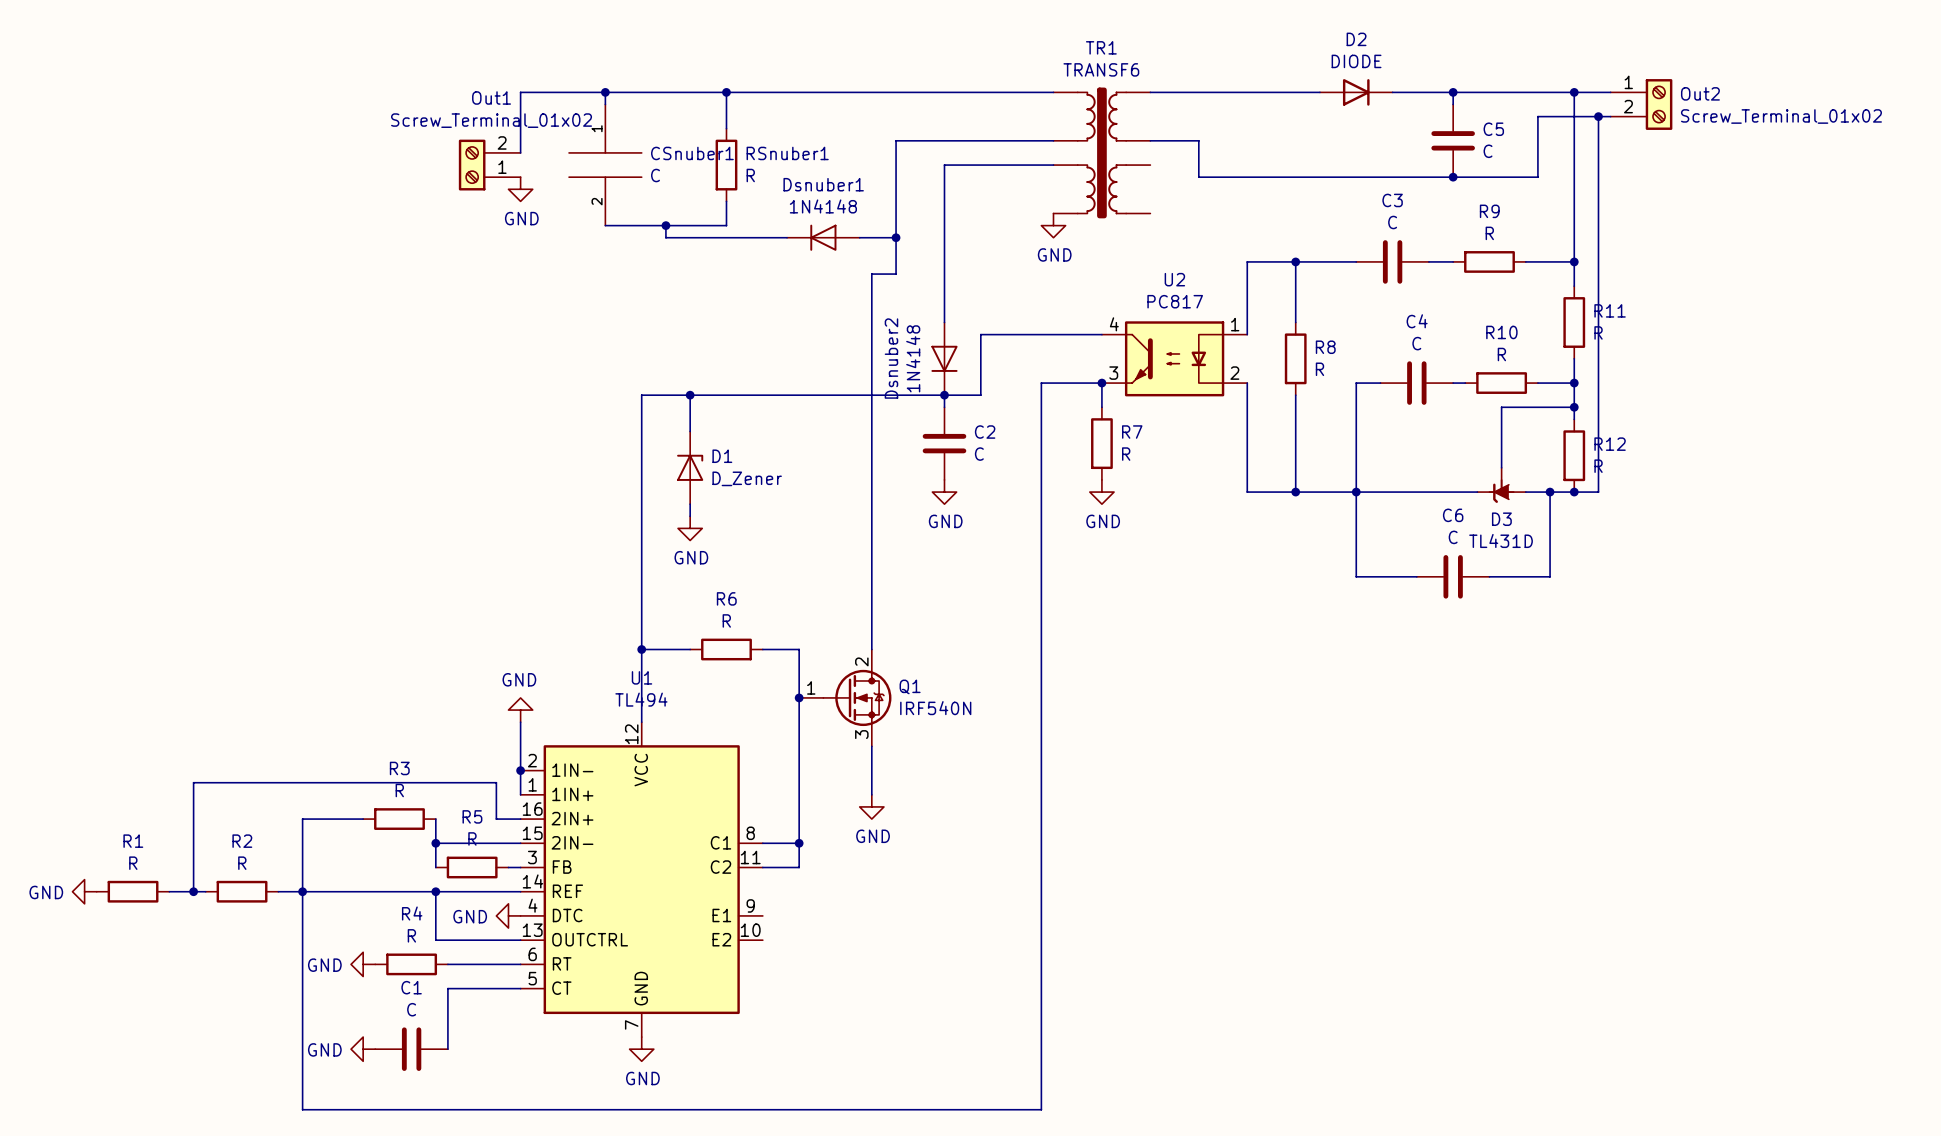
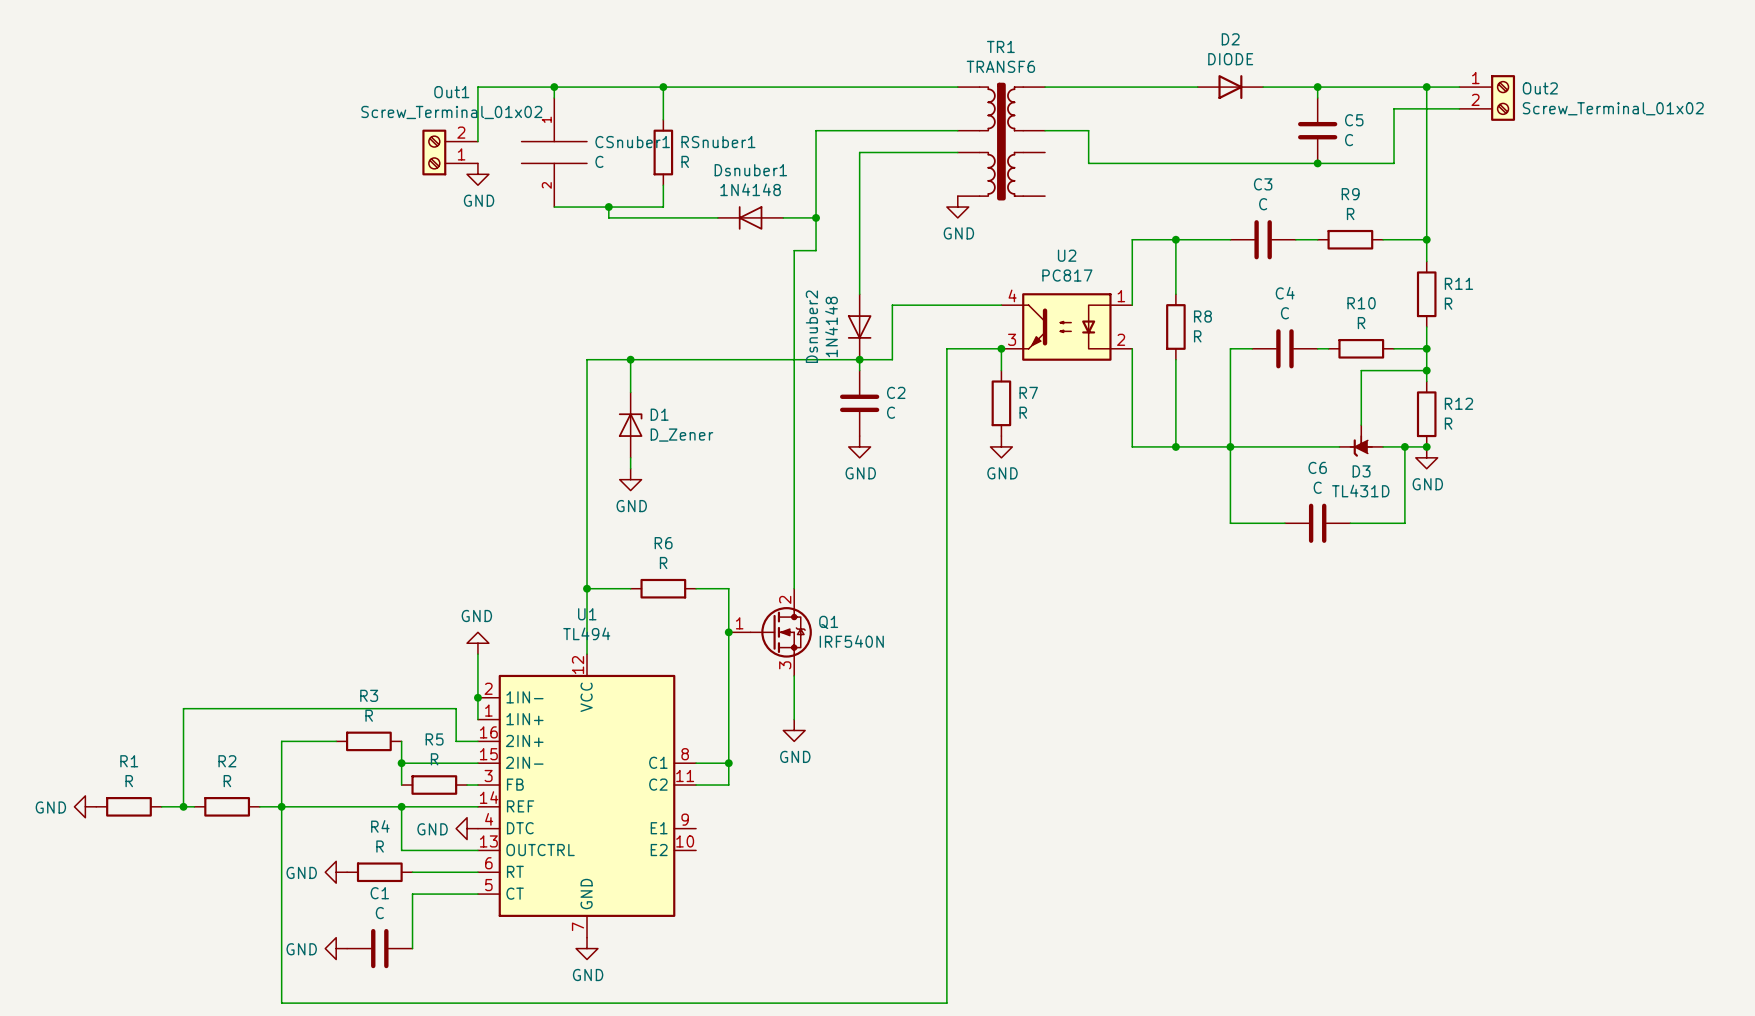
wire: (1598, 116) (1598, 492) (1574, 492) -> none
junction: (1598, 116) -> none
power symbol: none -> GND (1426, 457)

